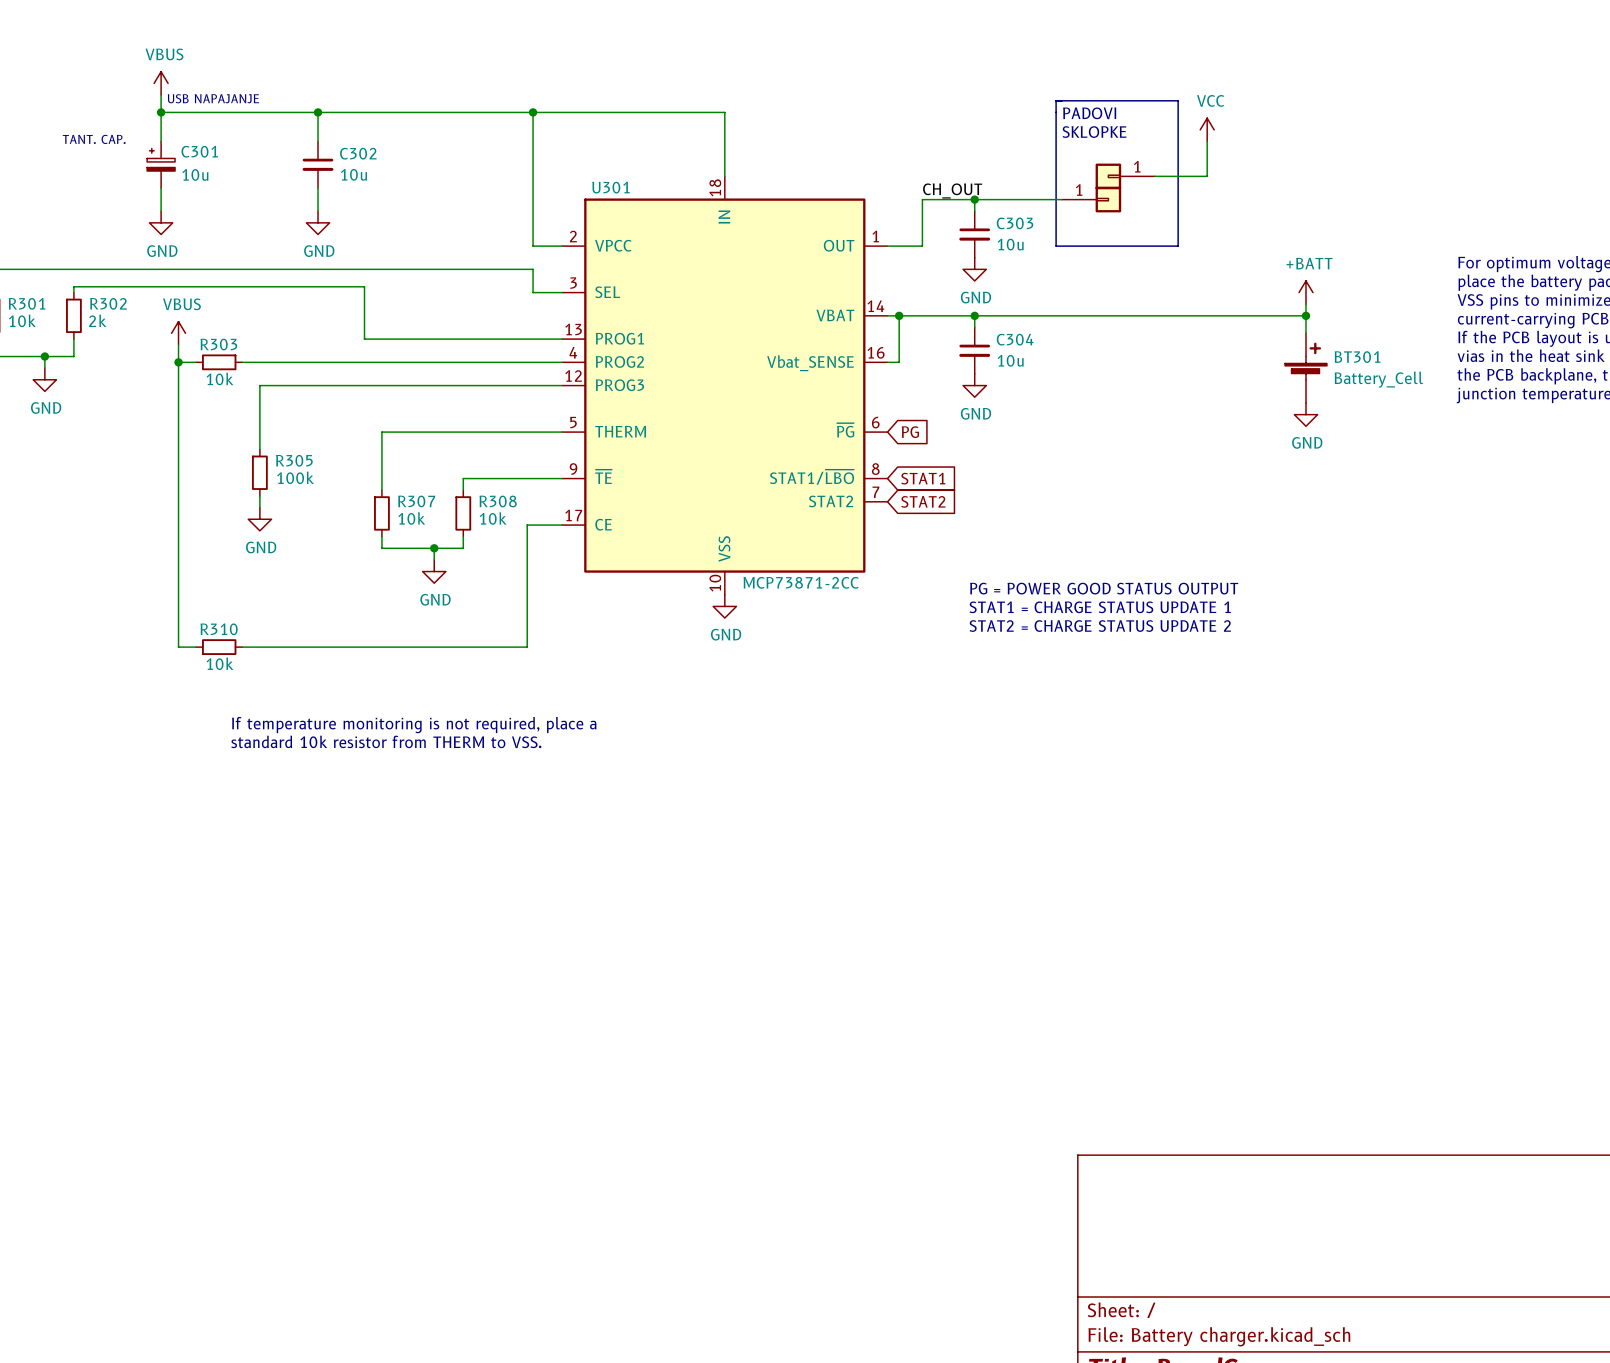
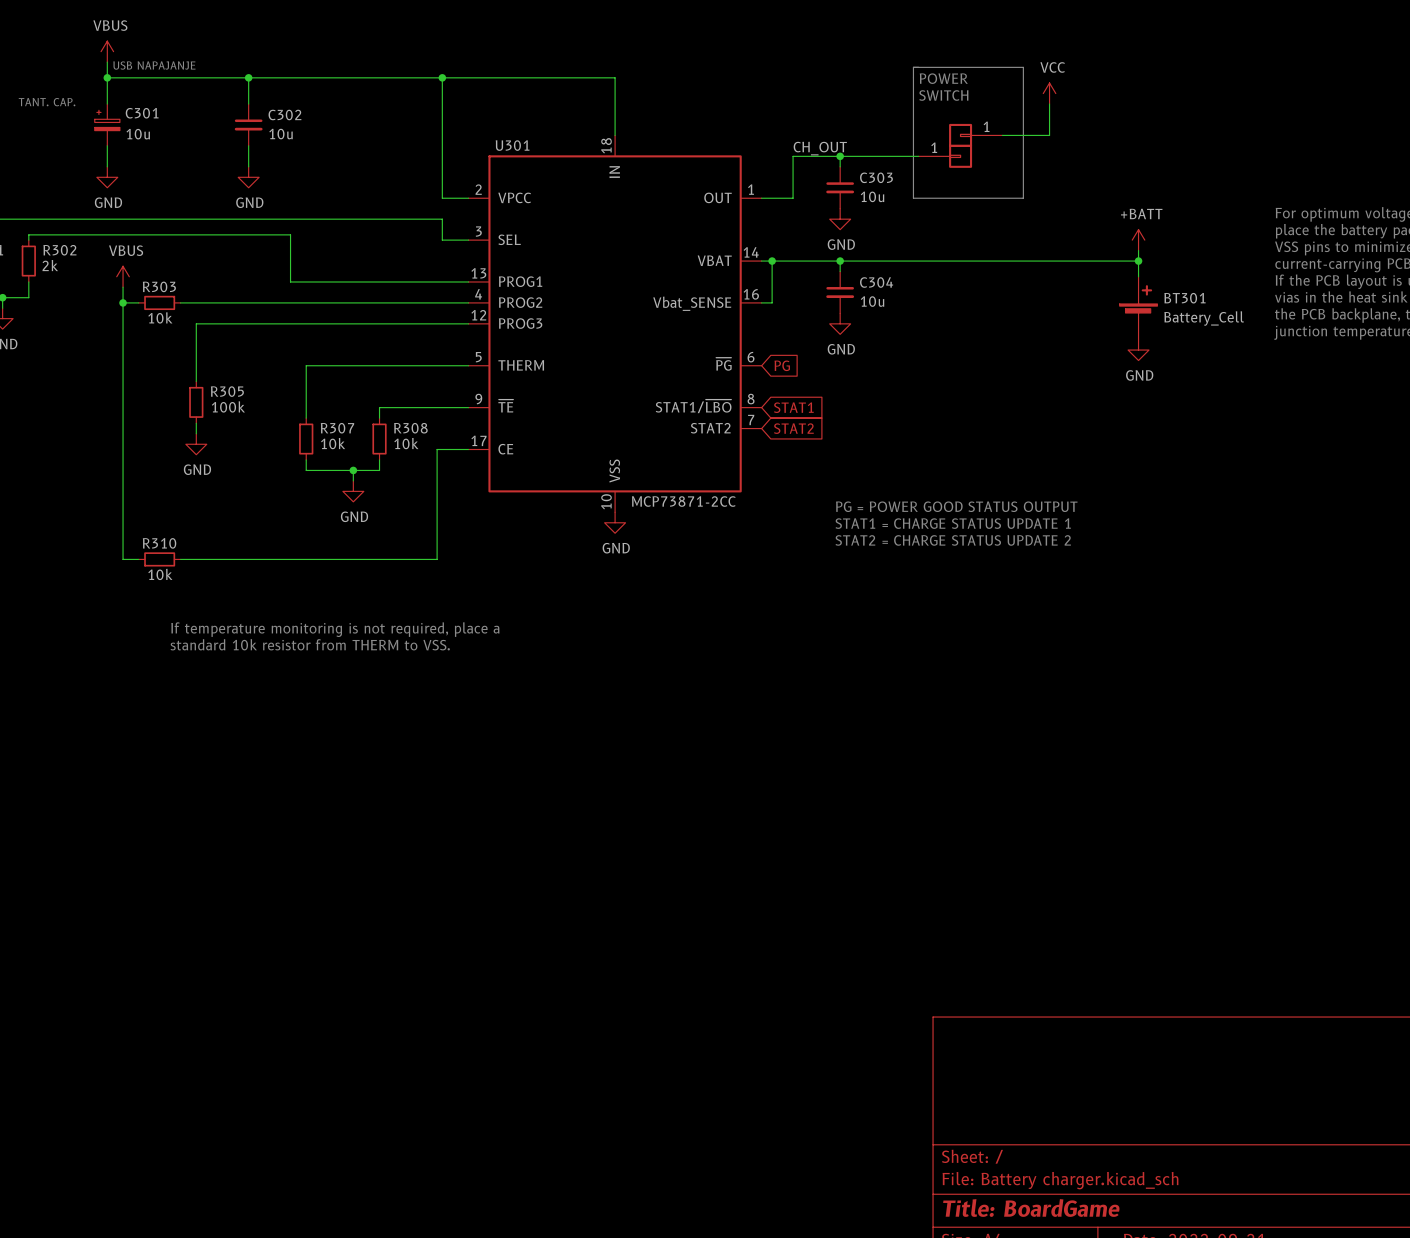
text: PADOVI (1089, 113) -> POWER (943, 78)
text: SKLOPKE (1094, 132) -> SWITCH (943, 95)

